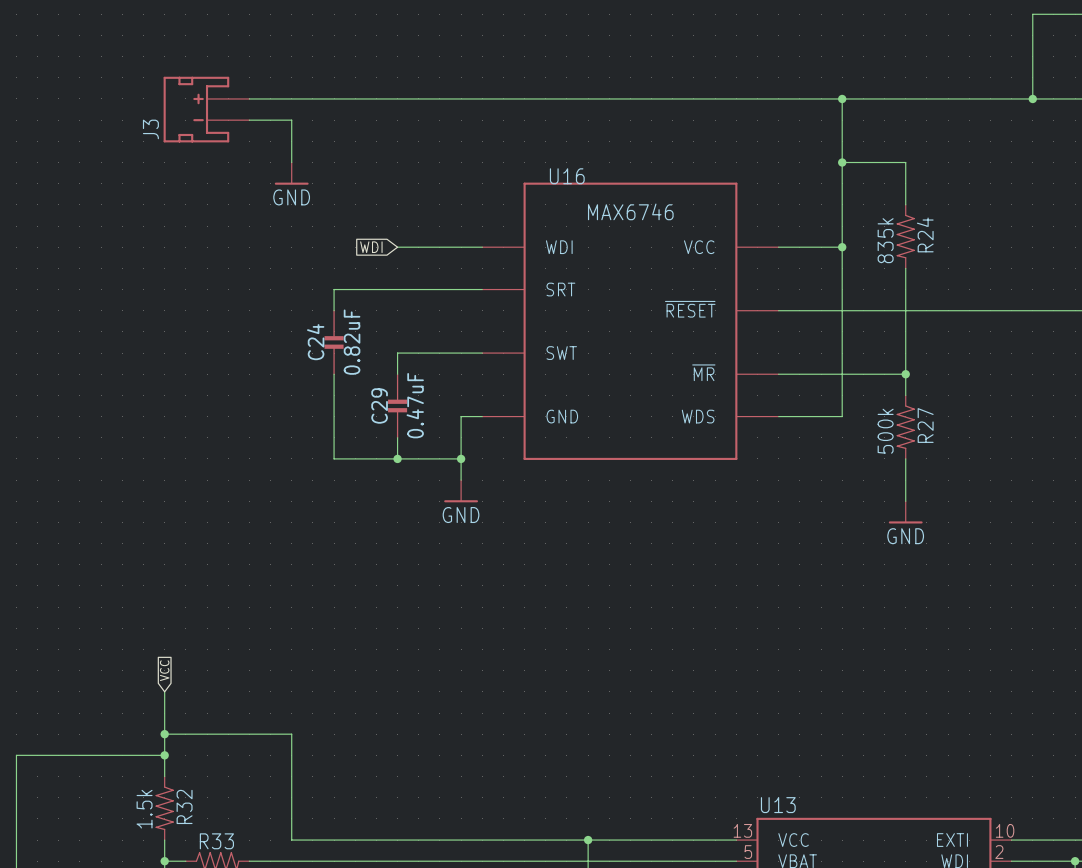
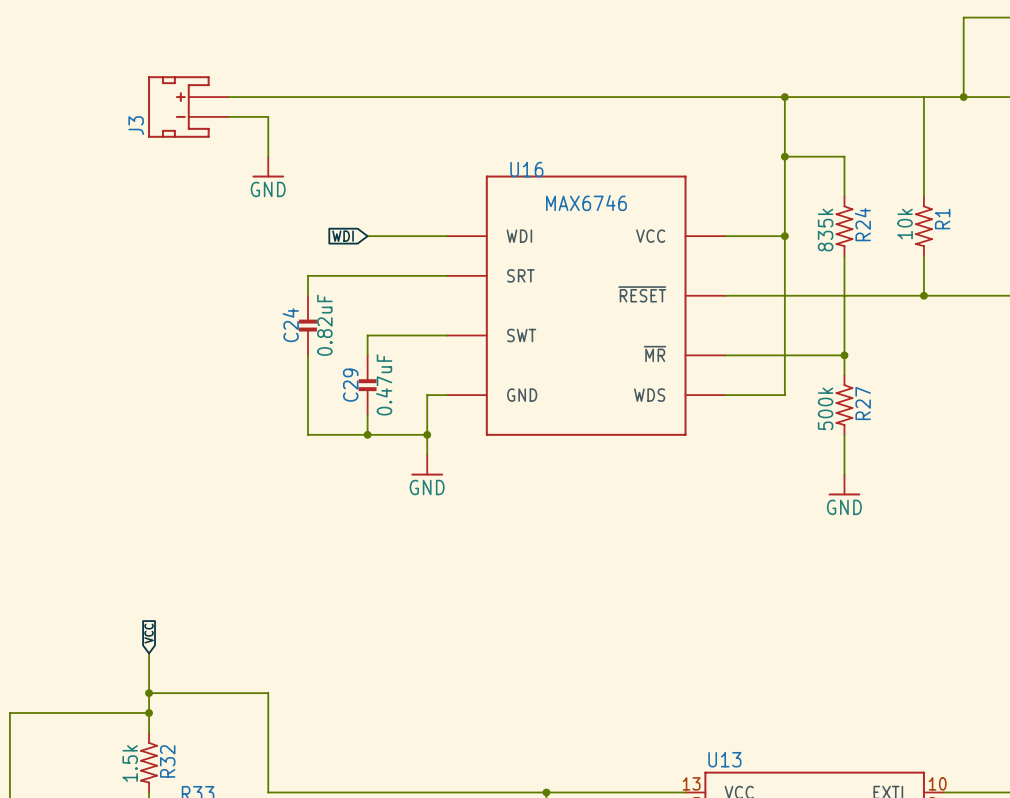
wire: none -> (923, 97) (923, 196)
R1: none -> 10k (923, 226)
wire: none -> (923, 256) (923, 295)
junction: none -> (923, 295)

